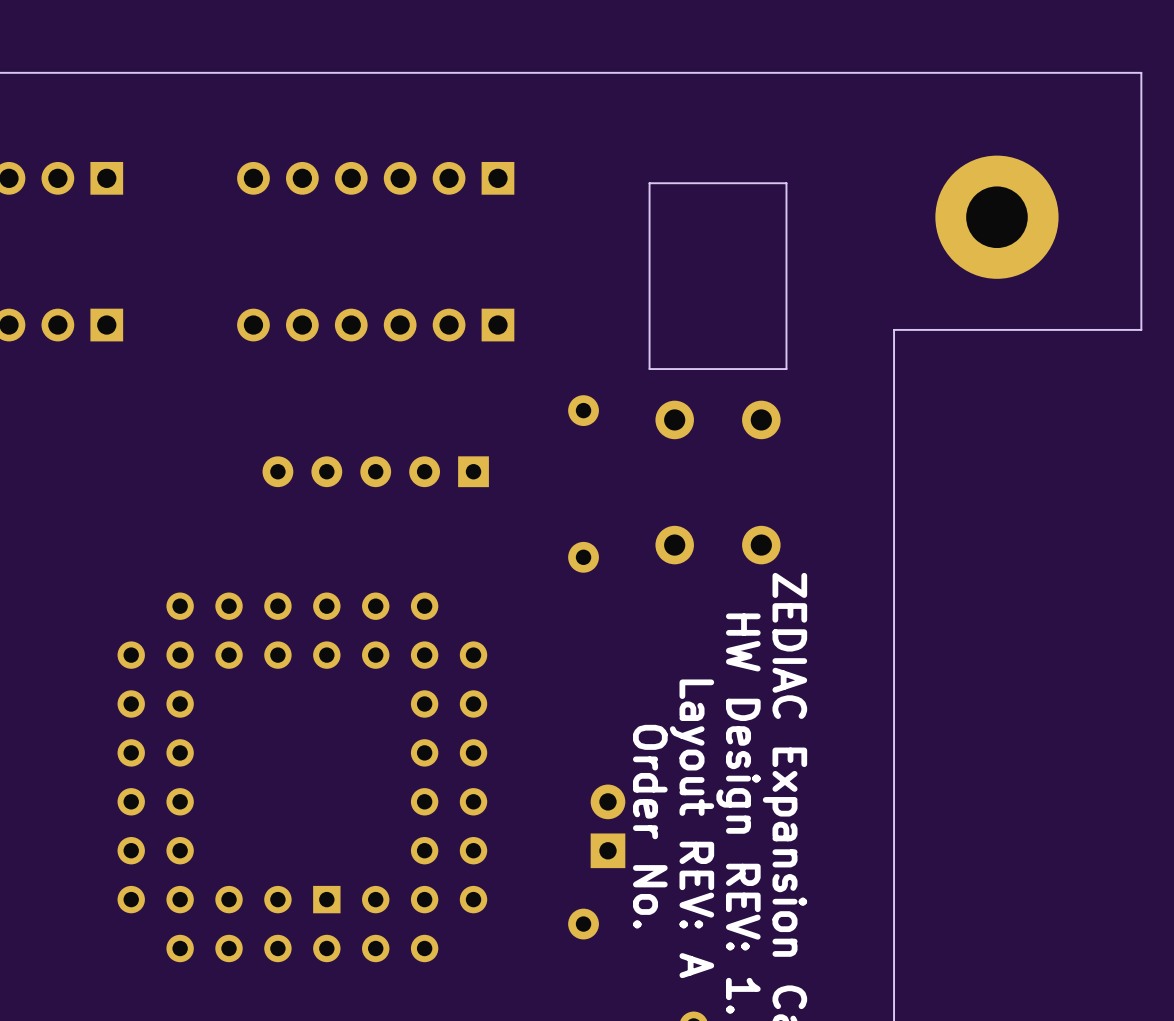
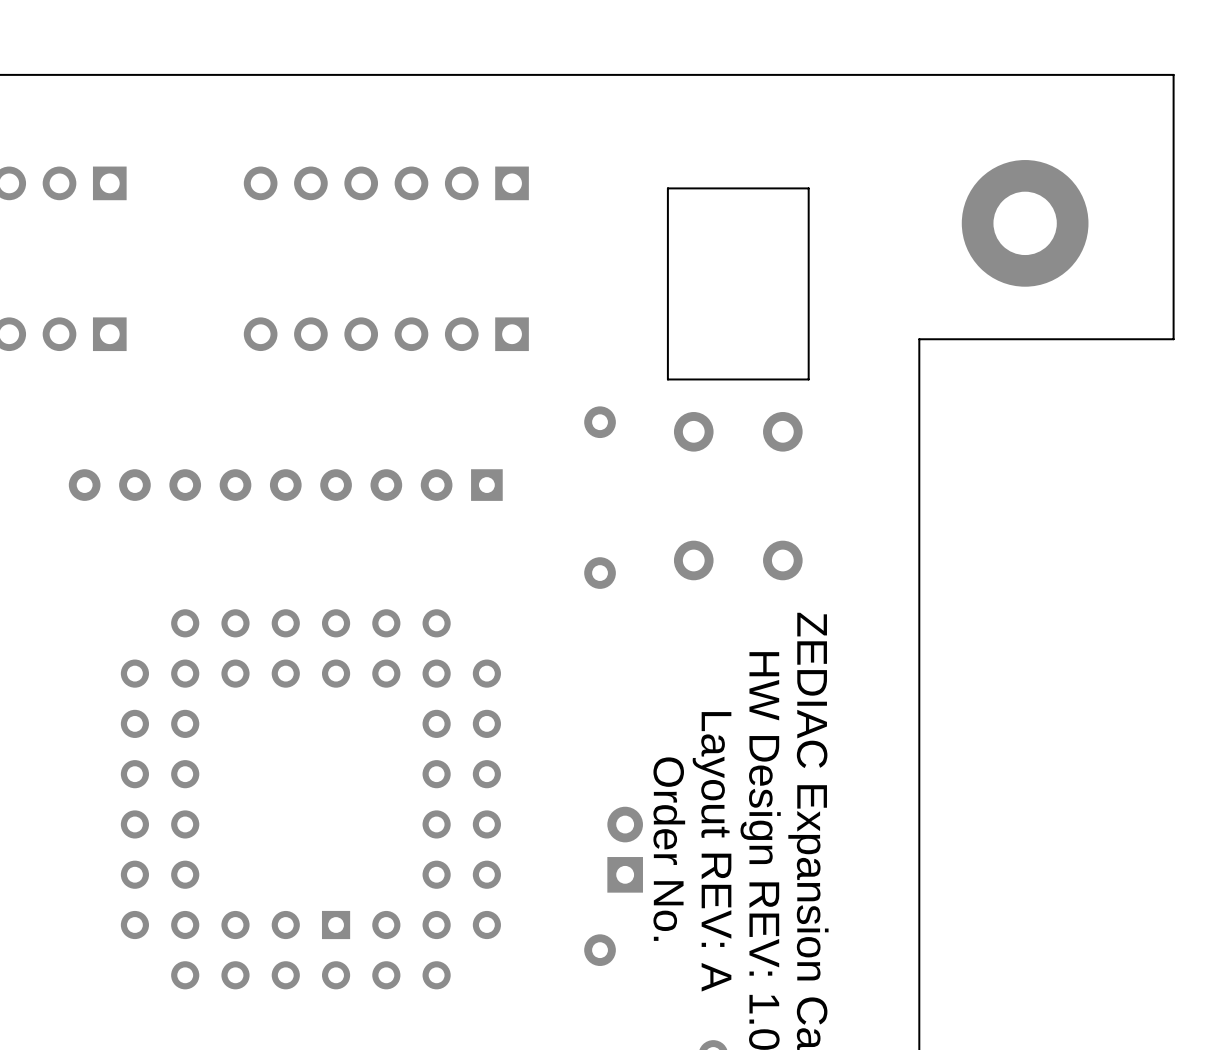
part: none -> (285, 485)

